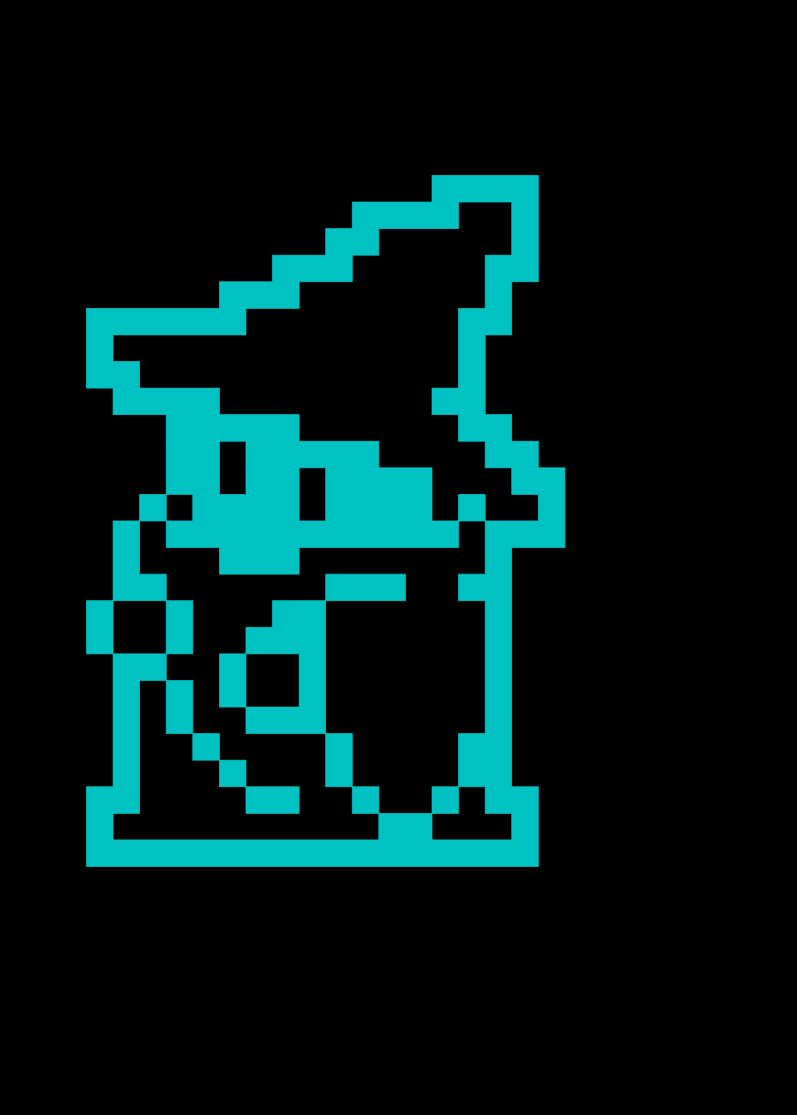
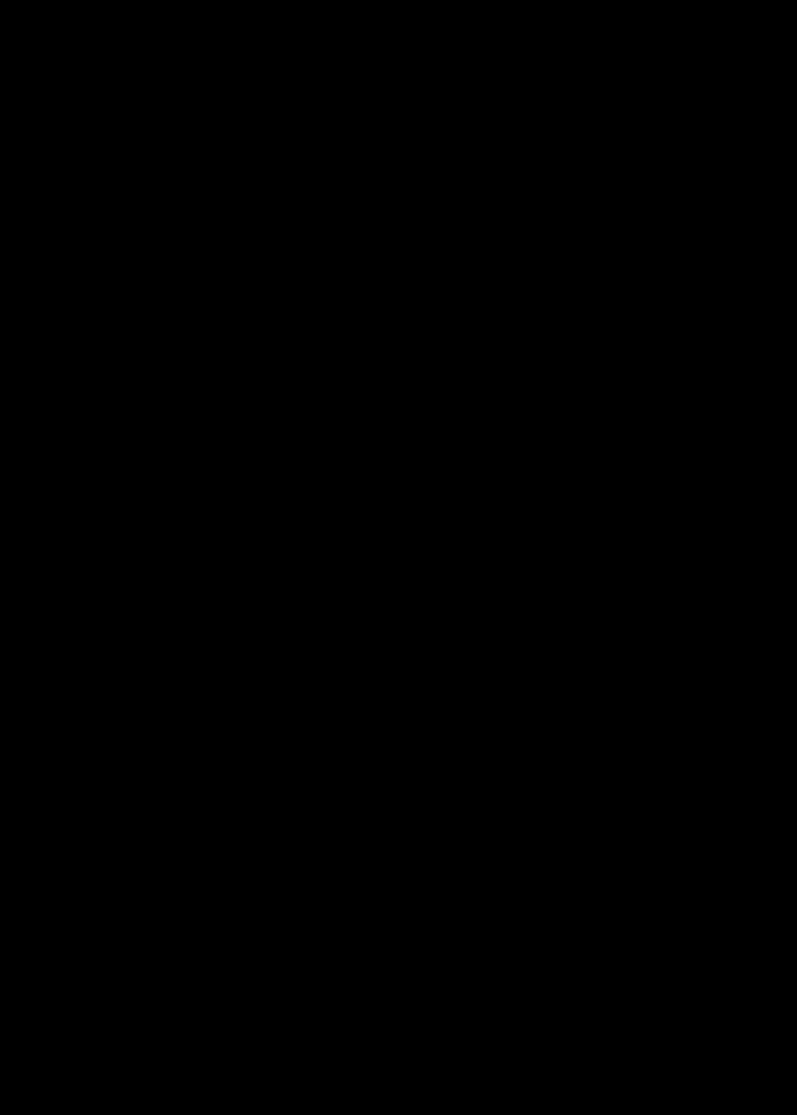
drawing: [86, 175, 566, 867] -> none

